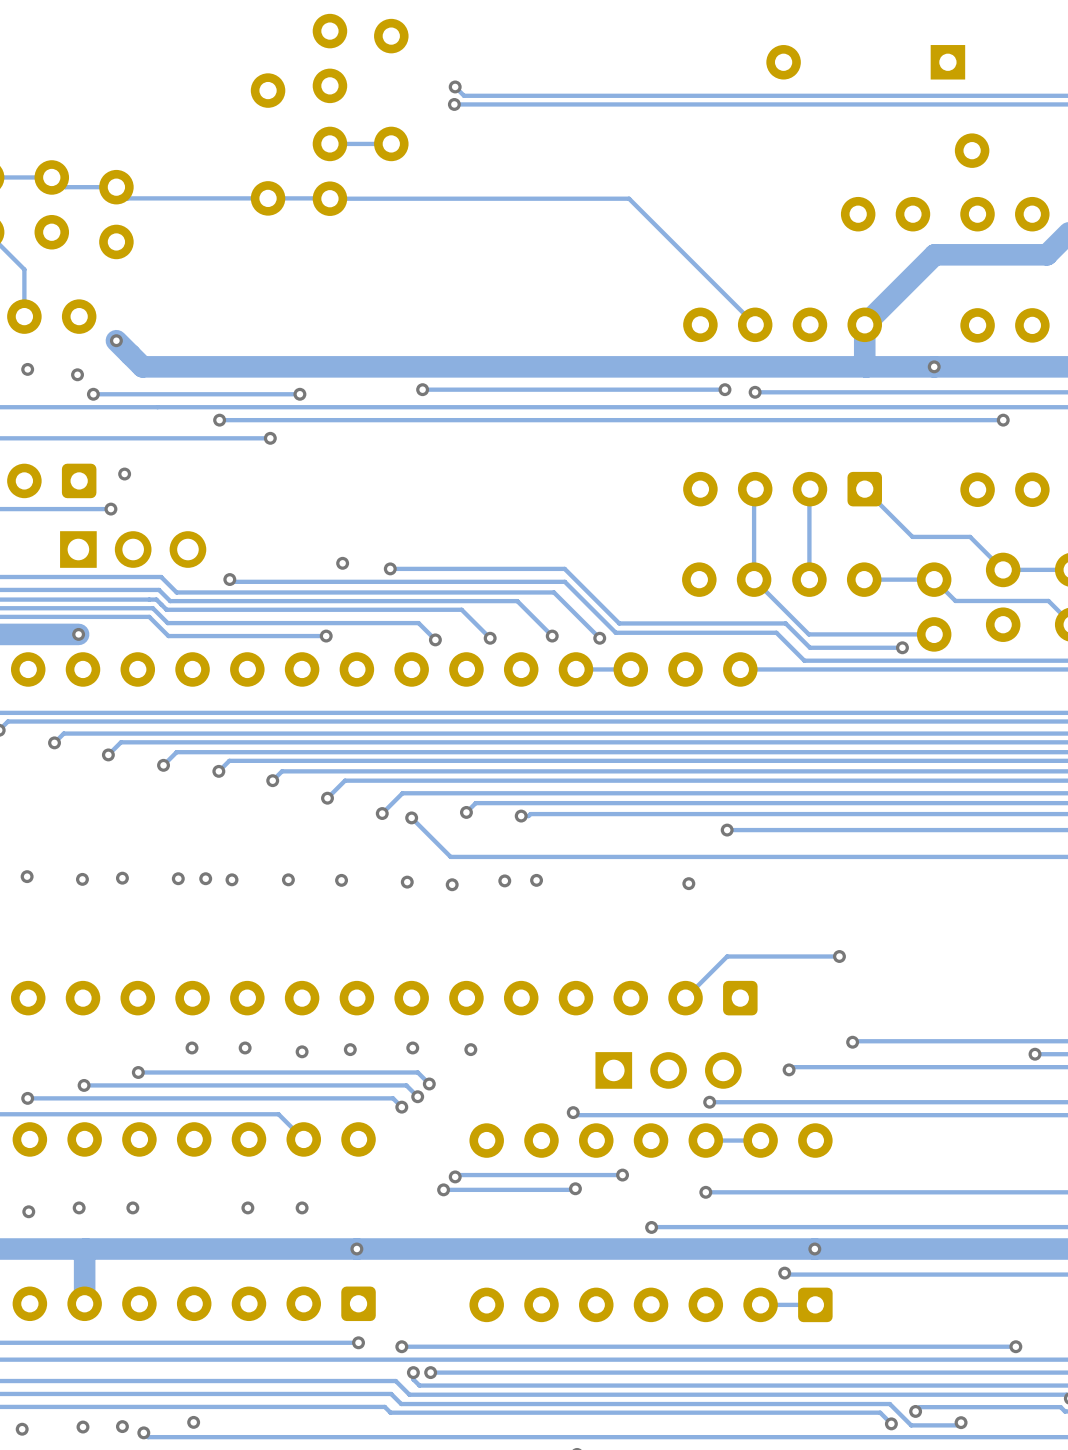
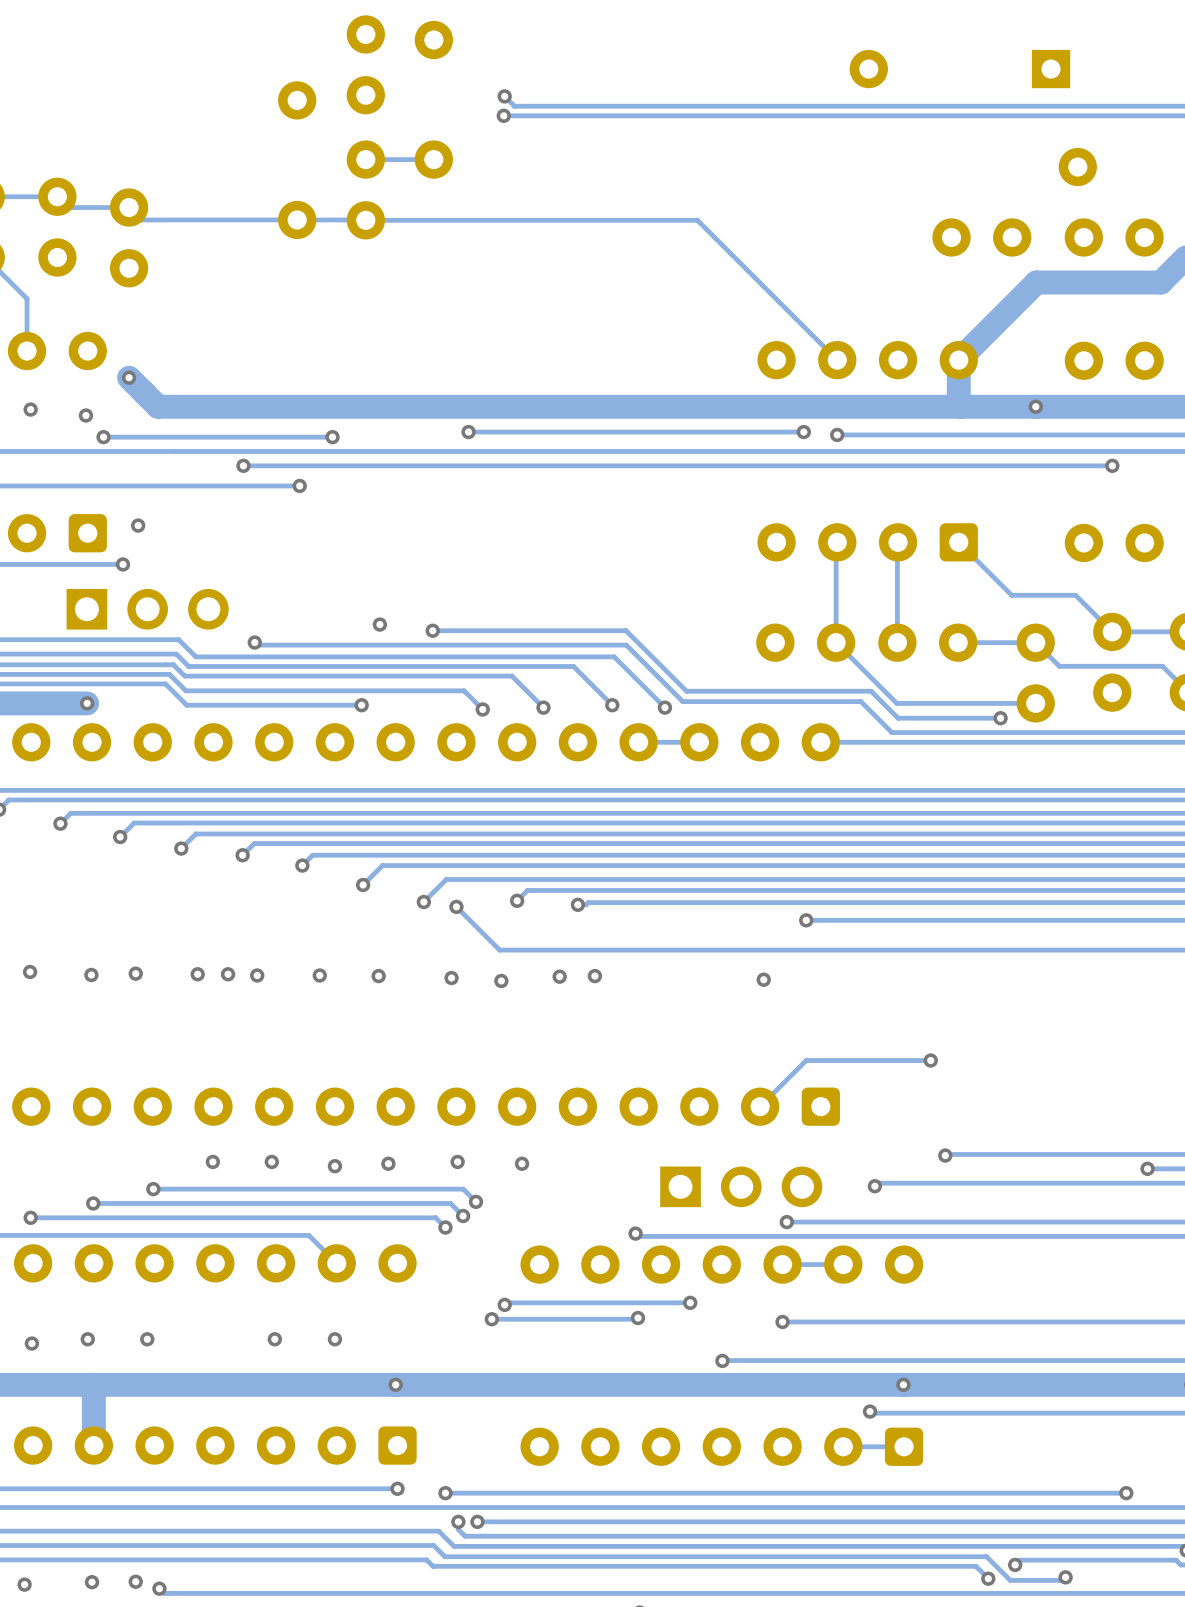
via: (193, 1422) -> none

